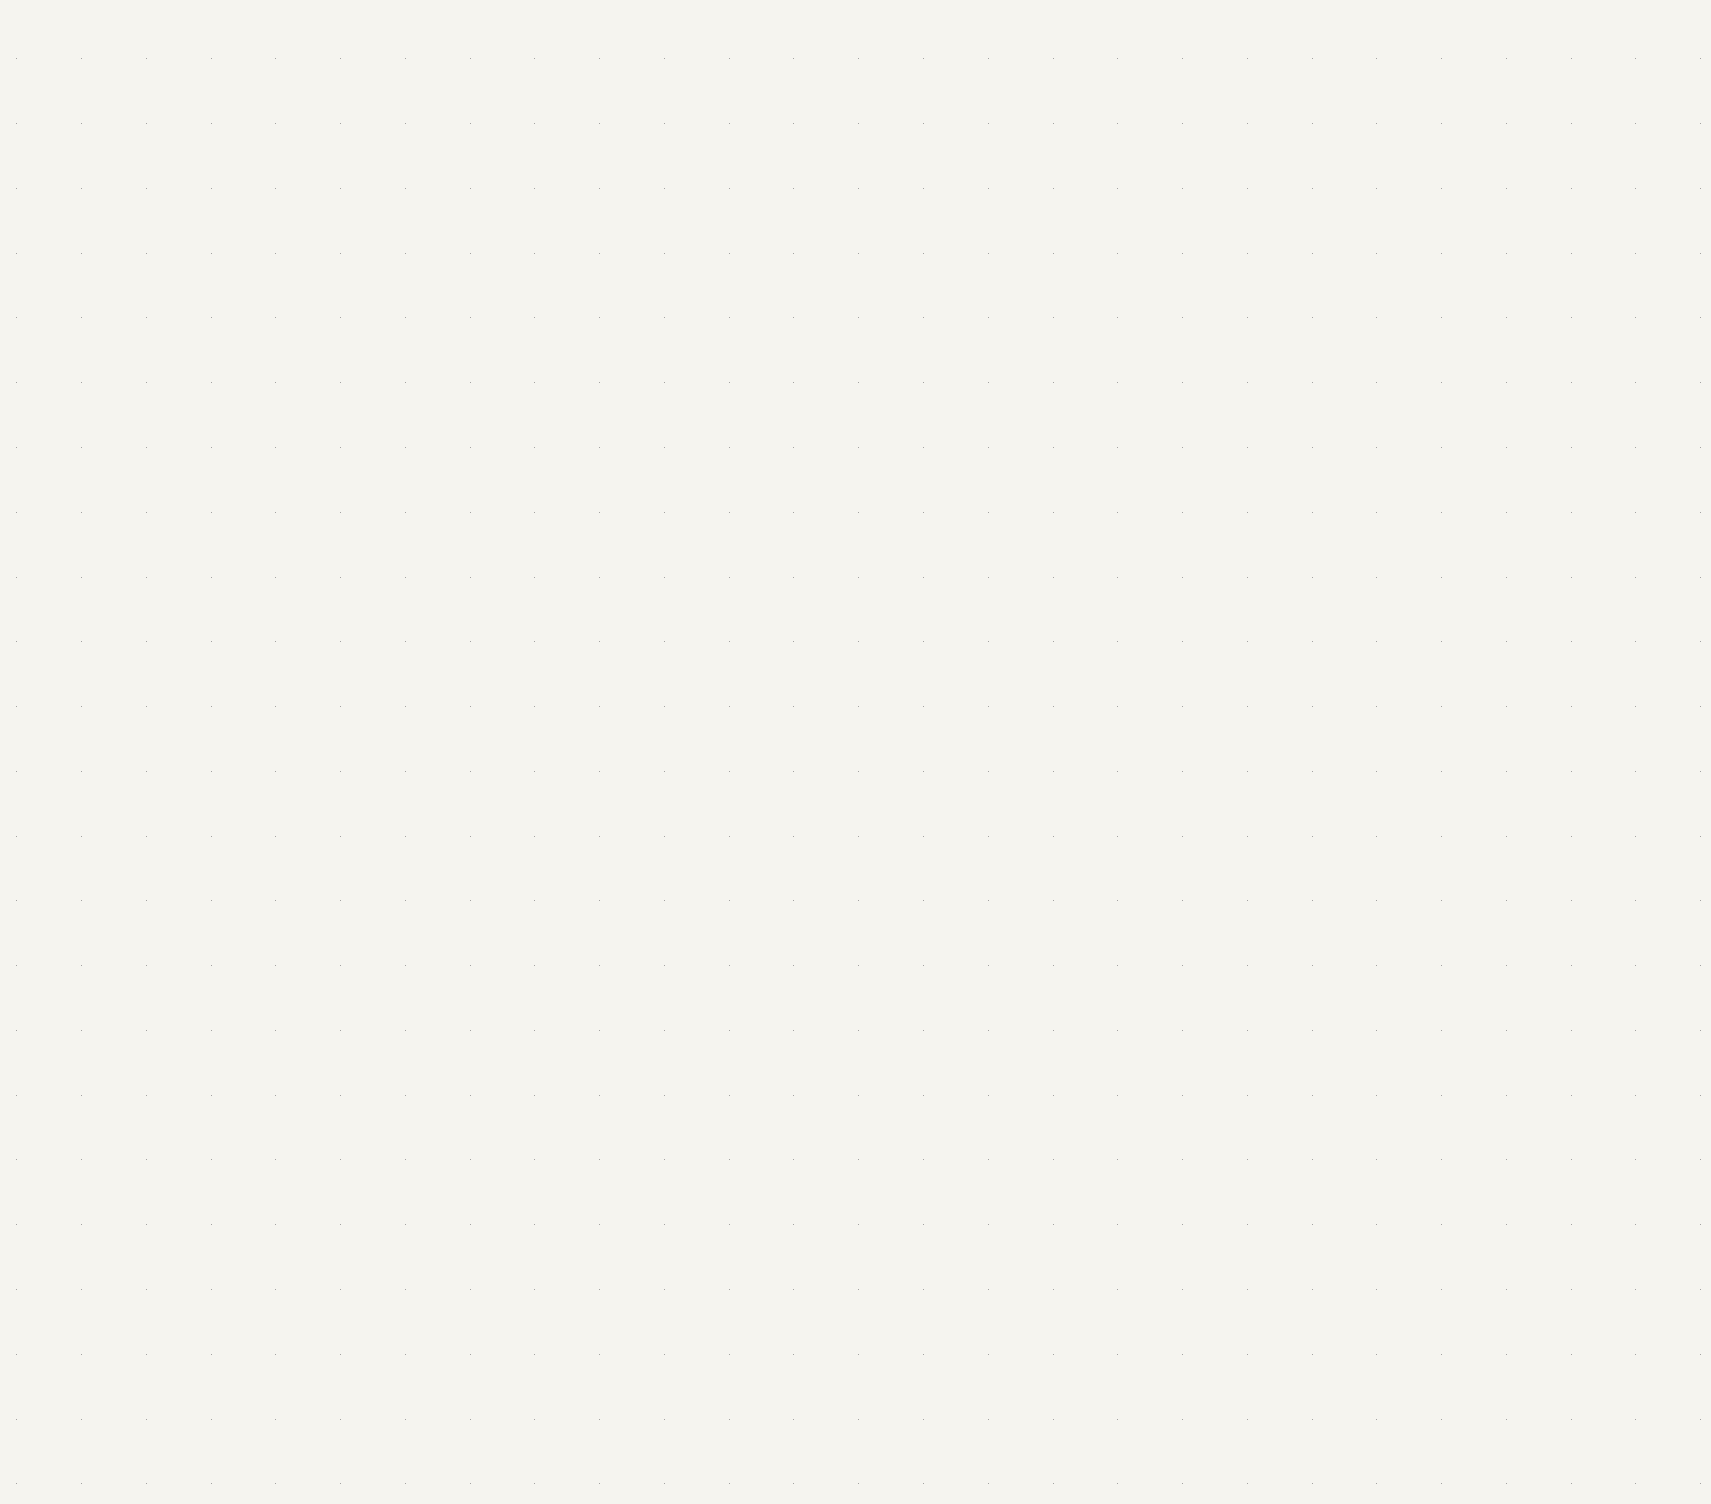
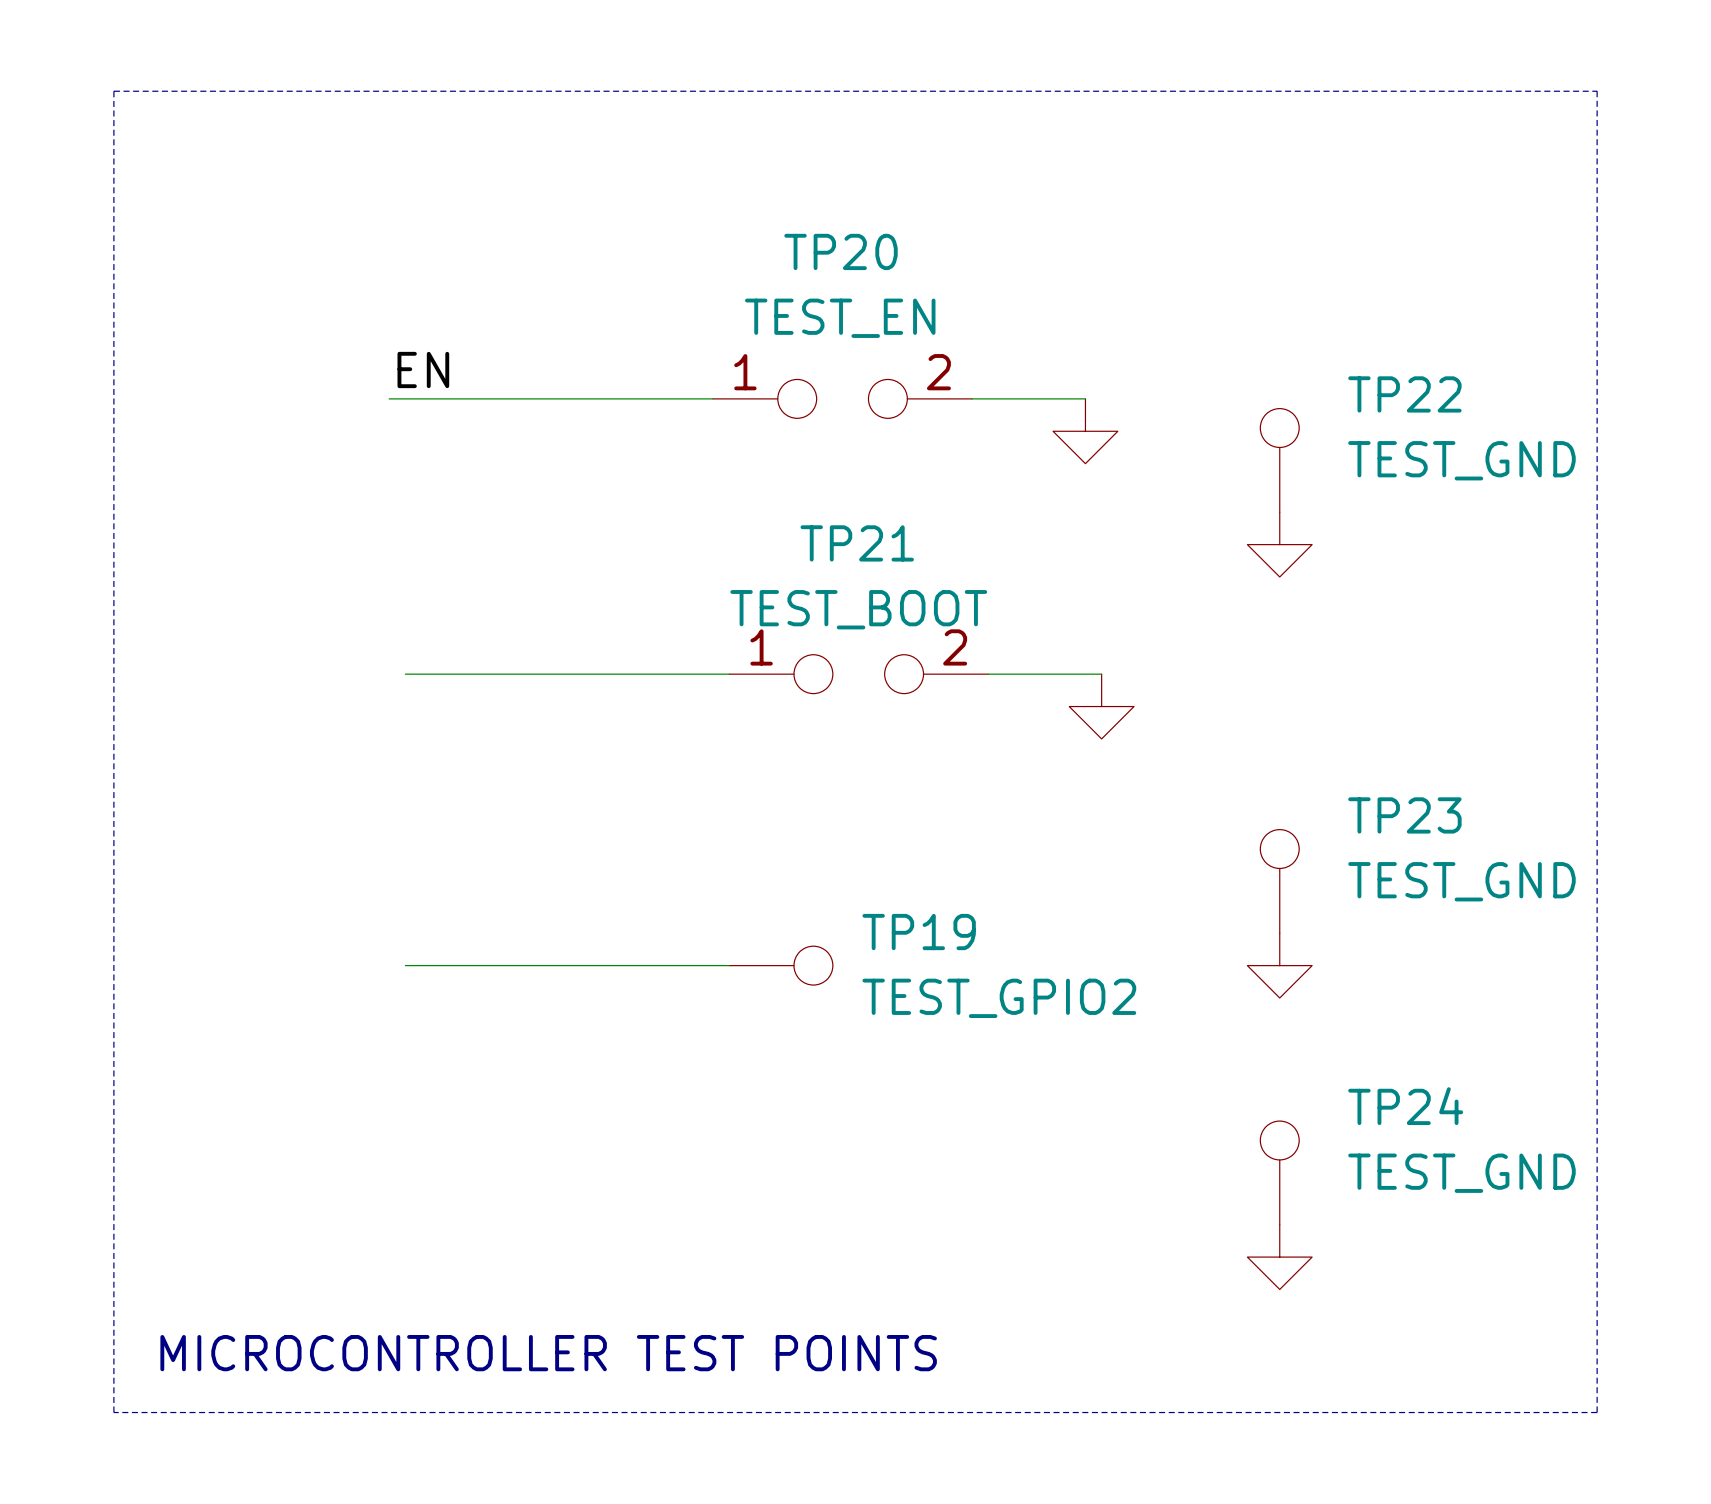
line: none -> (113, 91) (1597, 91) (1597, 1412) (113, 1412) (113, 91)
label: none -> EN (423, 369)
wire: none -> (389, 398) (713, 398)
TP20: none -> TEST_EN (842, 398)
wire: none -> (972, 398) (1085, 398)
power symbol: none -> (1085, 431)
TP22: none -> TEST_GND (1279, 460)
power symbol: none -> (1279, 544)
wire: none -> (405, 674) (729, 674)
TP21: none -> TEST_BOOT (858, 674)
wire: none -> (988, 674) (1101, 674)
power symbol: none -> (1101, 706)
TP23: none -> TEST_GND (1279, 881)
wire: none -> (405, 965) (729, 965)
TP19: none -> TEST_GPIO2 (781, 965)
power symbol: none -> (1279, 965)
TP24: none -> TEST_GND (1279, 1172)
power symbol: none -> (1279, 1257)
text: none -> MICROCONTROLLER TEST POINTS (548, 1353)

